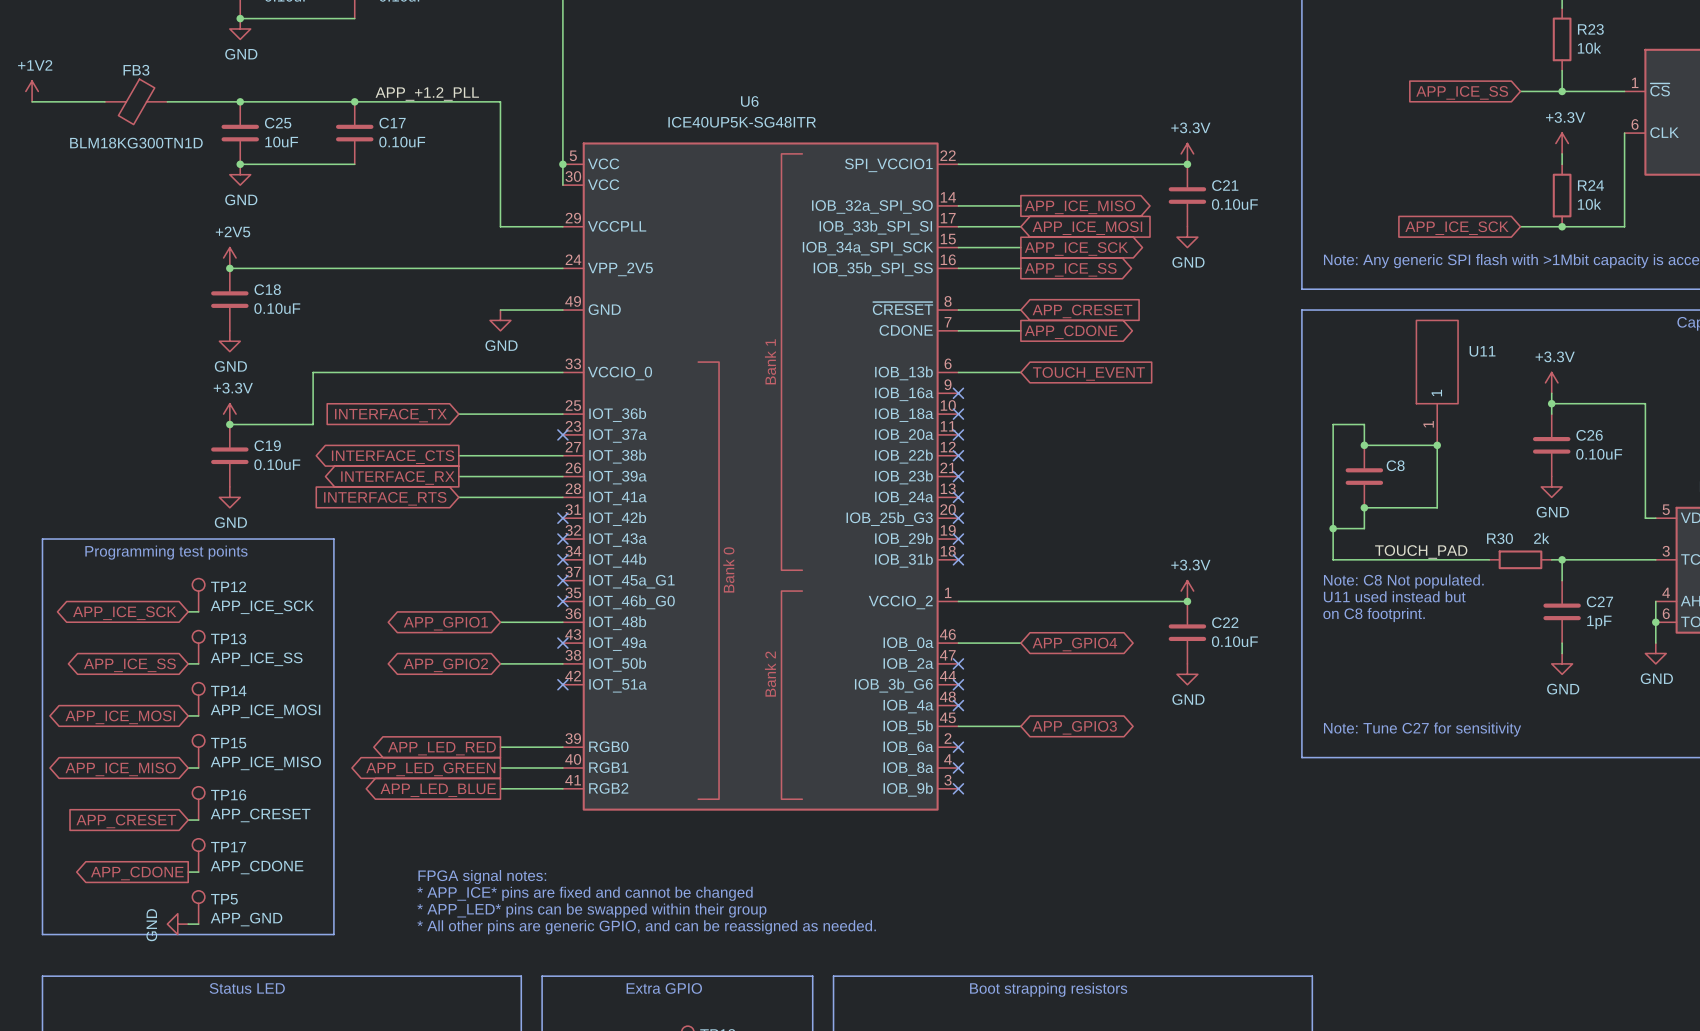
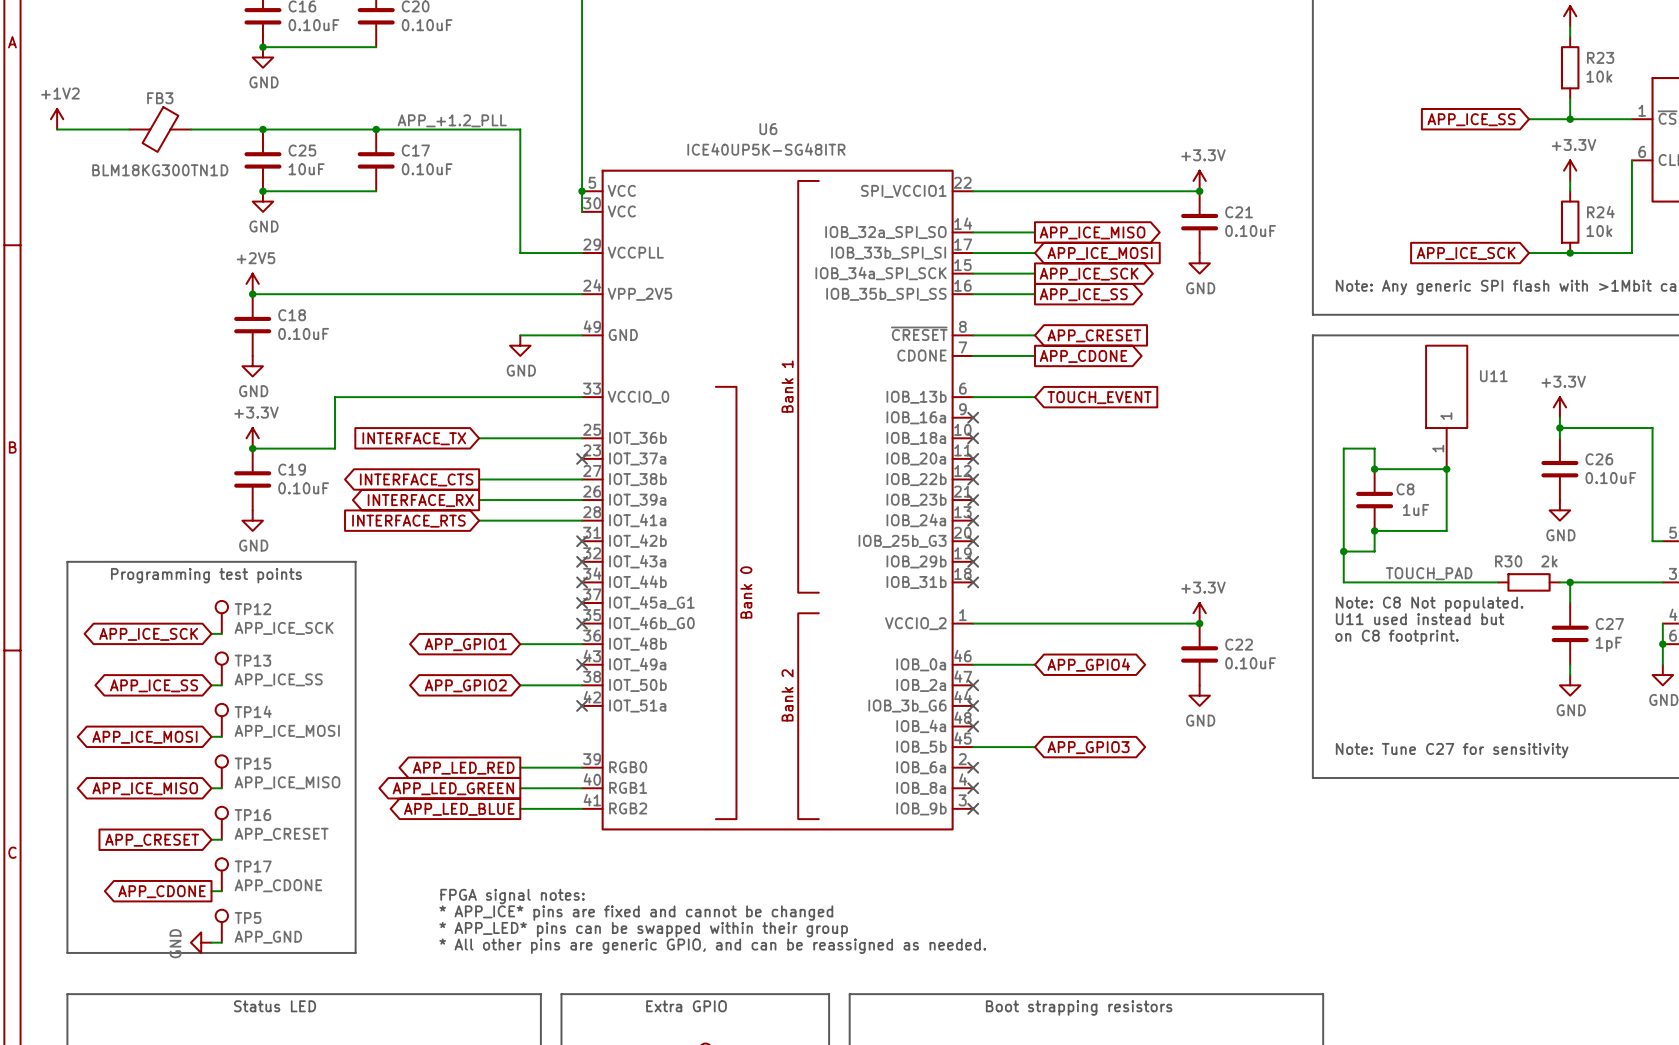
C8 value: none -> 1uF (1416, 509)

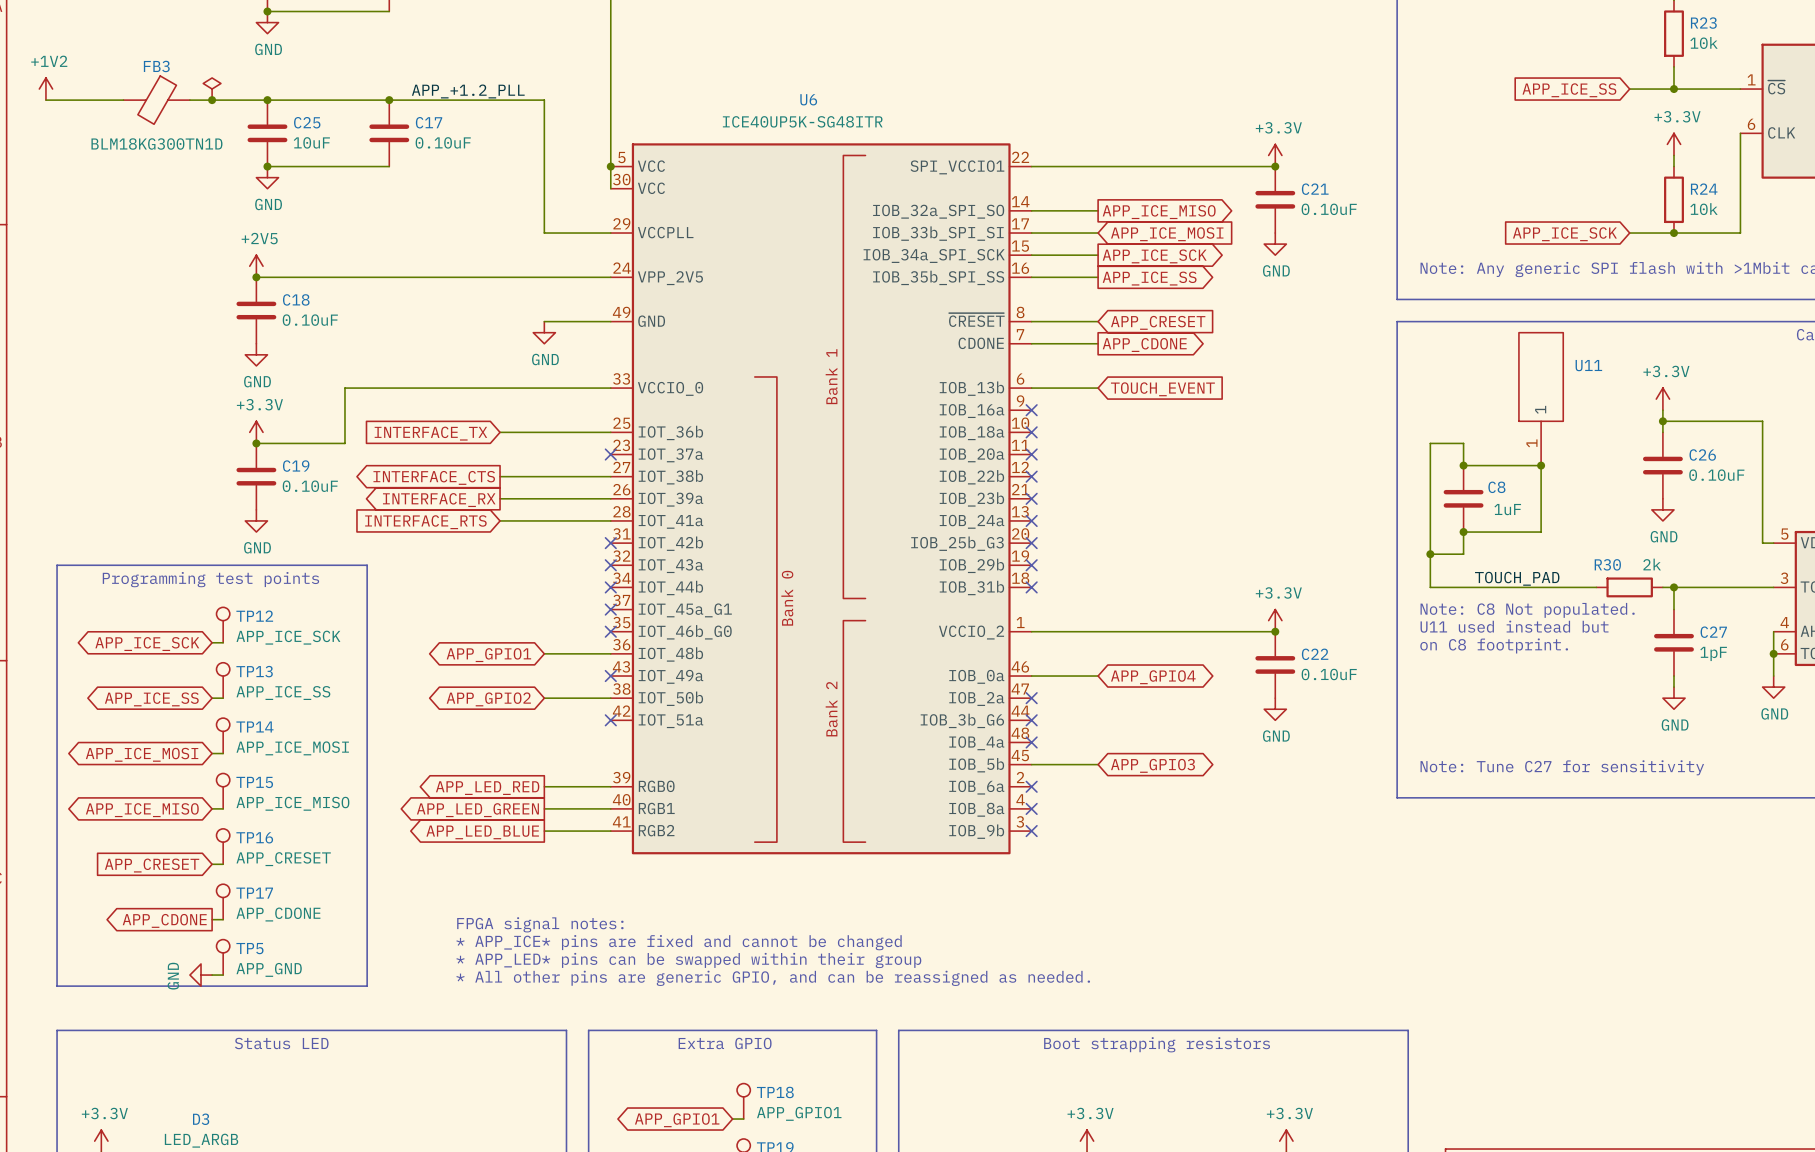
power symbol: none -> (212, 89)
junction: none -> (212, 100)

